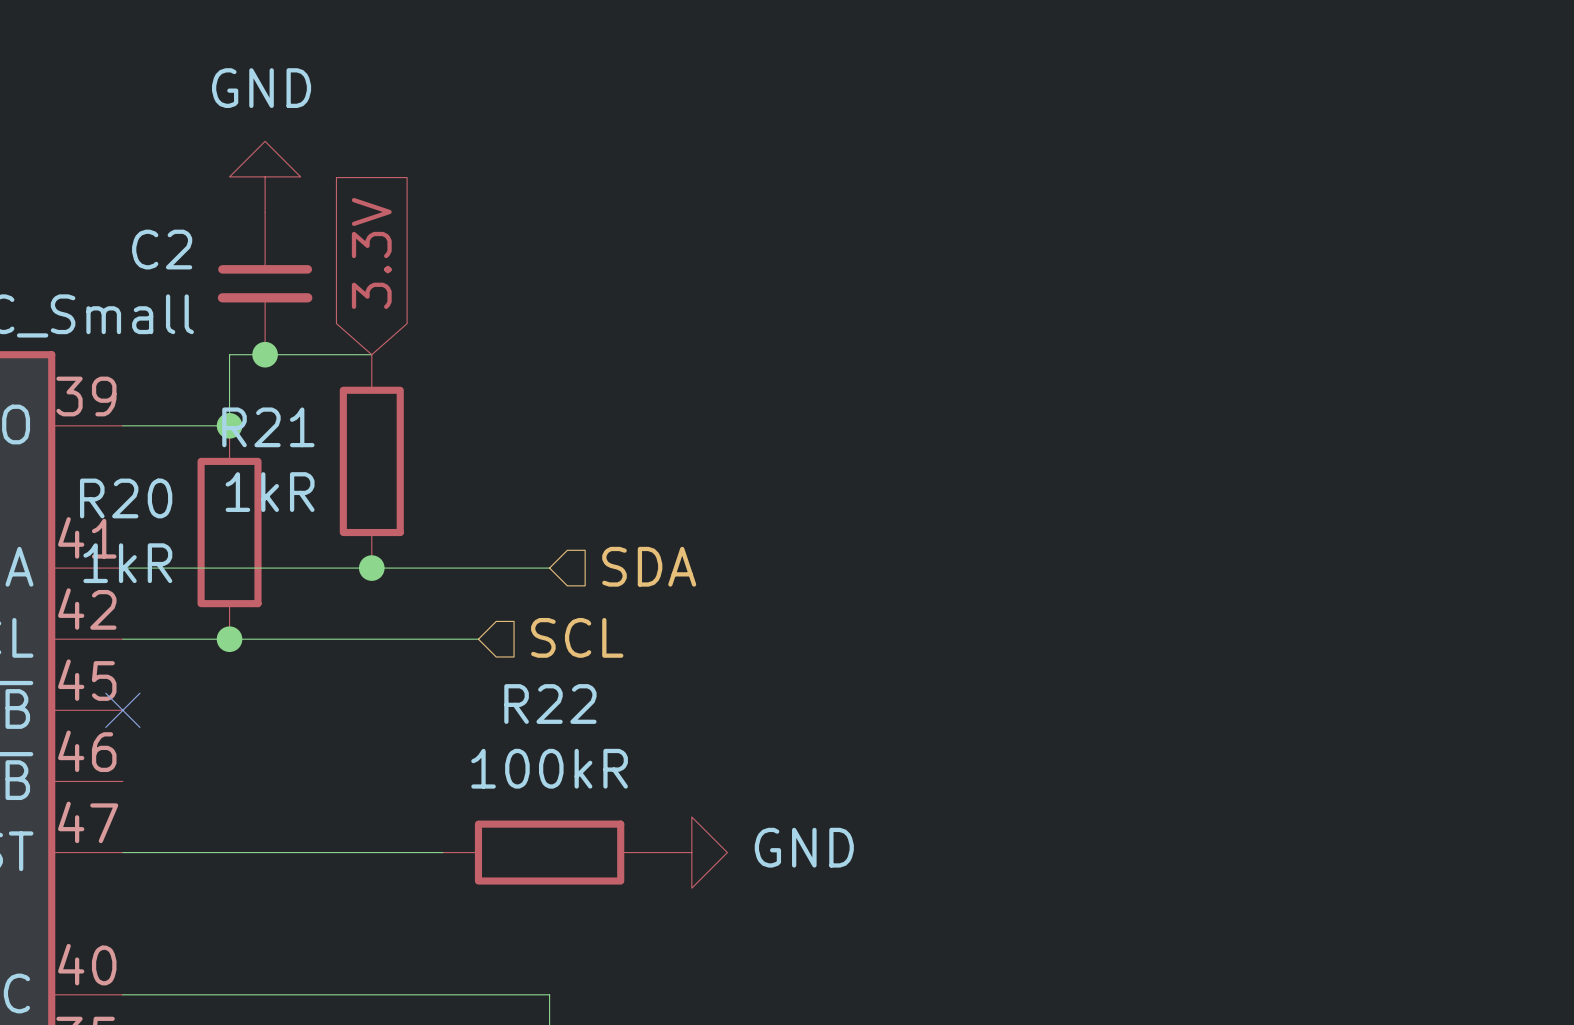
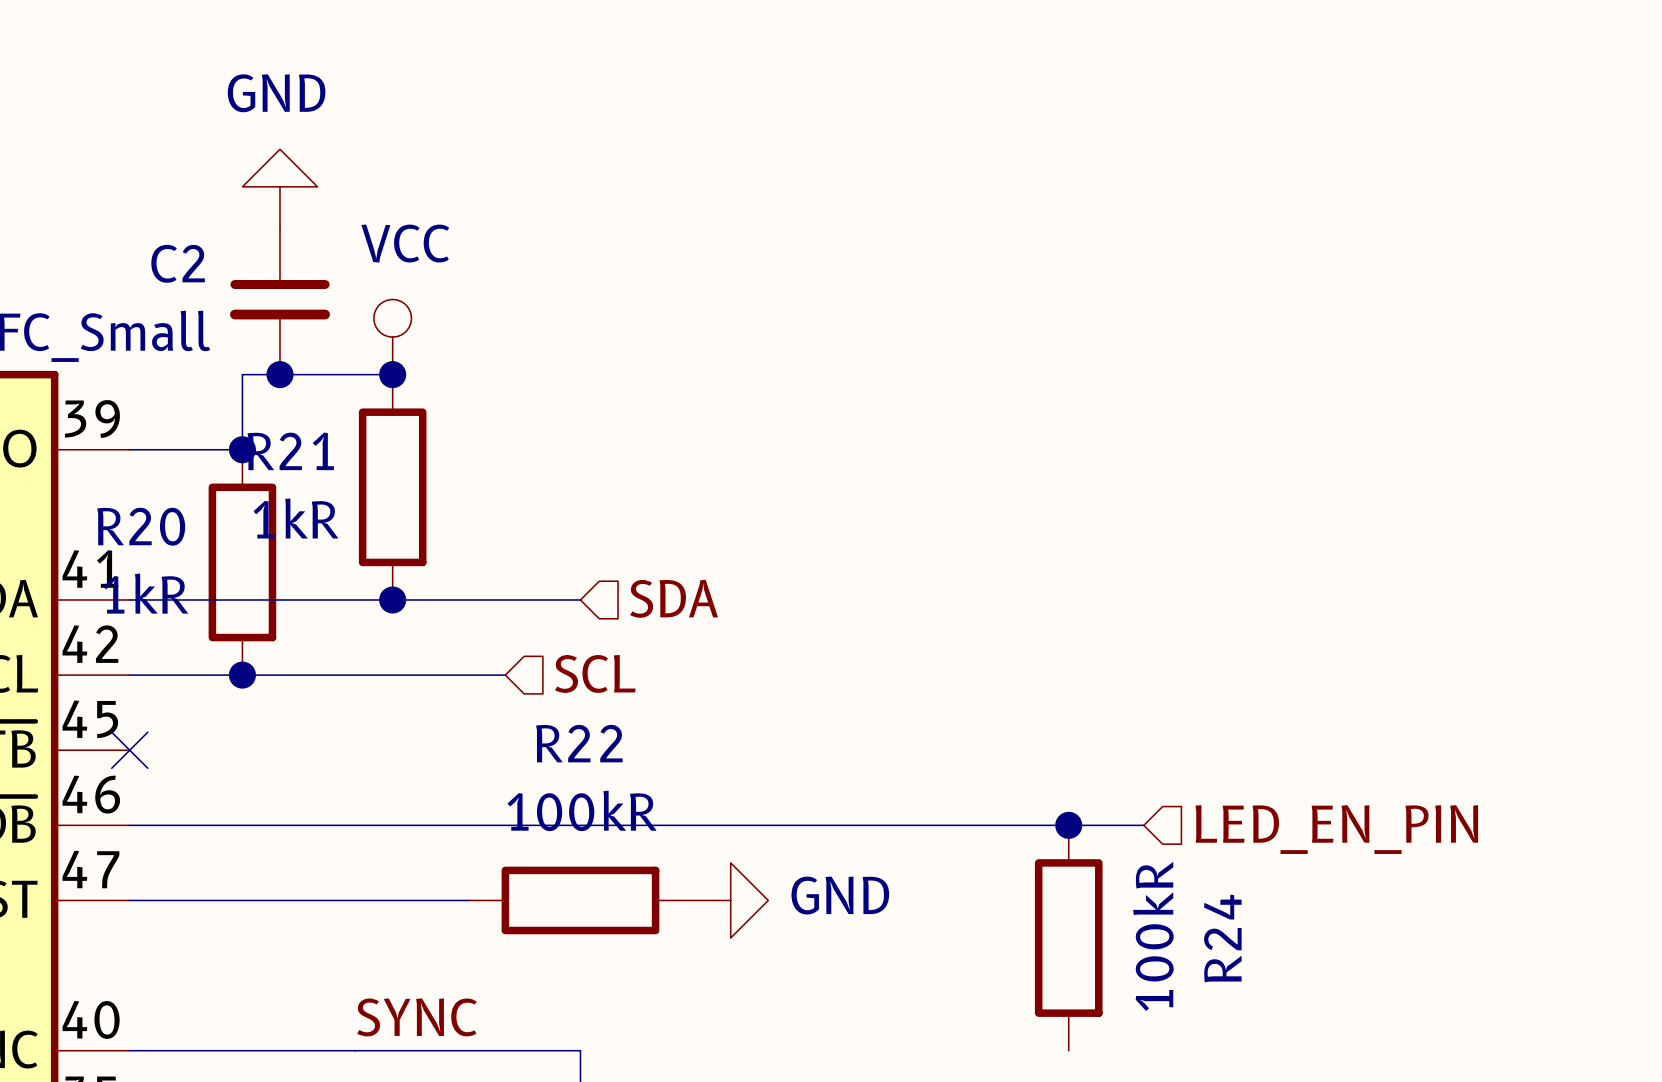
global label: 3.3V (371, 253) -> none
power symbol: none -> VCC (392, 337)
junction: none -> (392, 374)
wire: none -> (129, 825) (1143, 825)
junction: none -> (1068, 825)
hierarchical label: none -> LED_EN_PIN (1336, 829)
R24: none -> 100kR (1068, 938)
label: none -> SYNC (416, 1017)

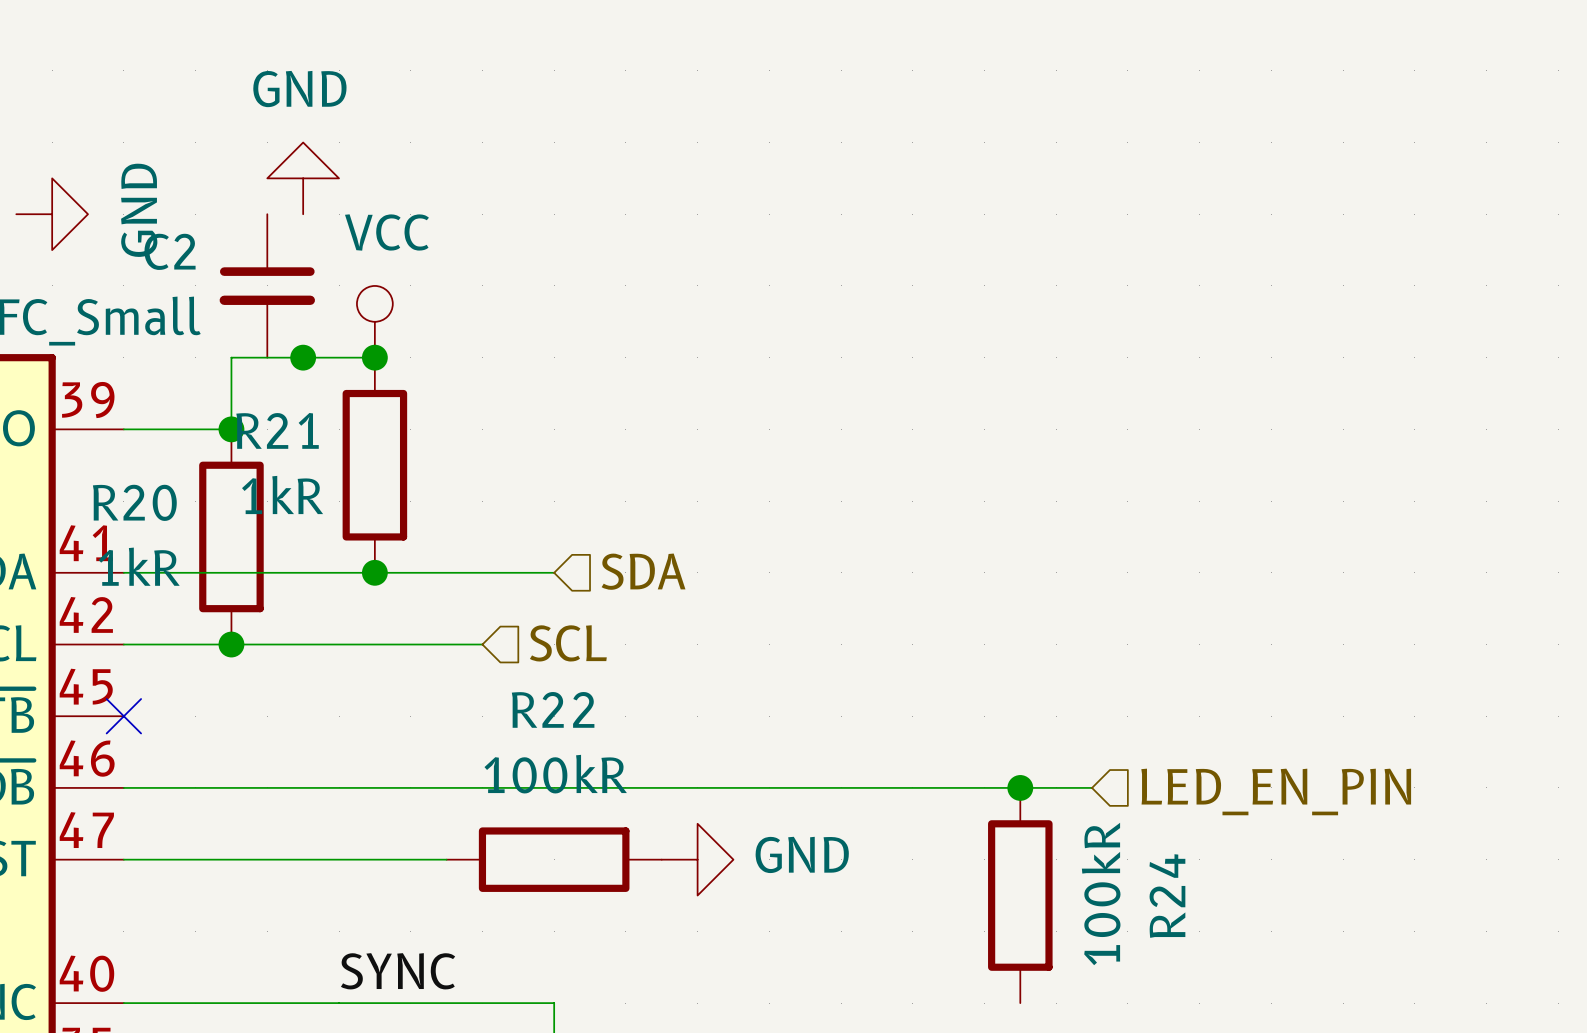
power symbol position: GND (279, 186) -> GND (303, 178)
power symbol: none -> GND (52, 214)
junction position: (279, 374) -> (303, 357)

